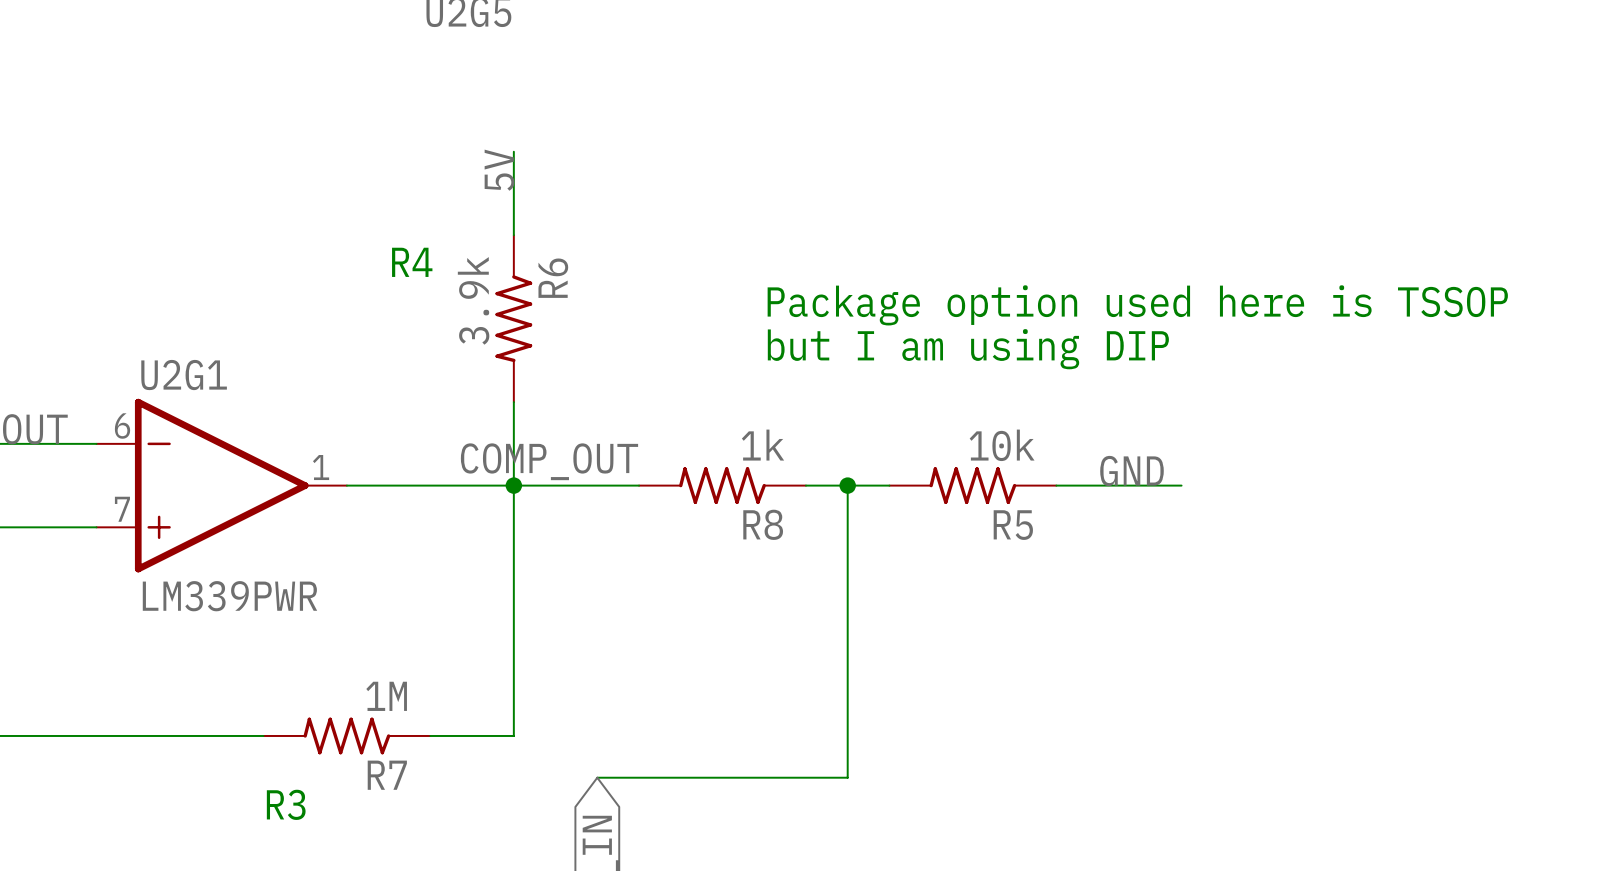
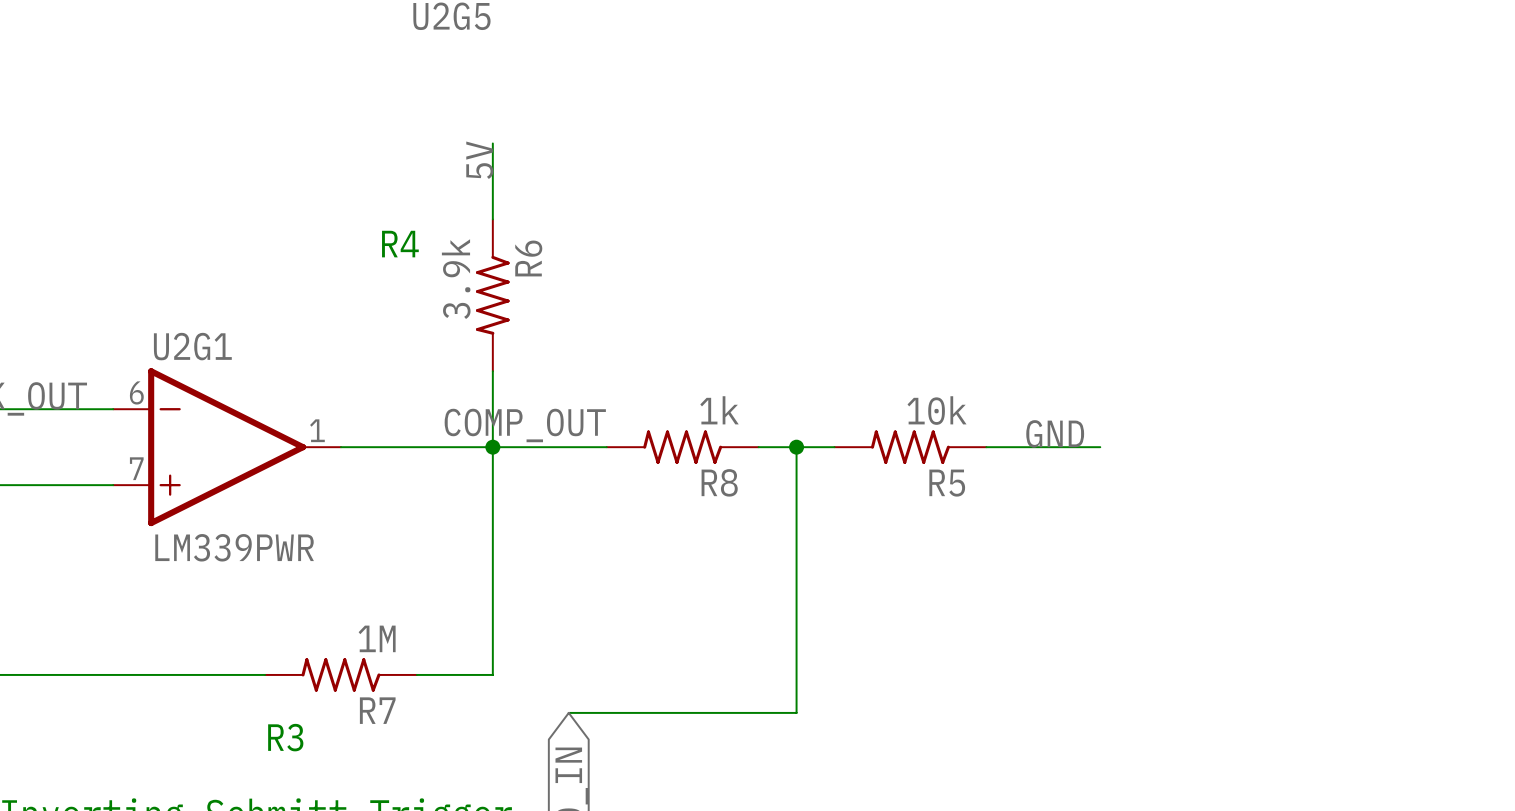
text: Package option used here is TSSOP (1137, 305) -> none
text: but I am using DIP (968, 349) -> none

